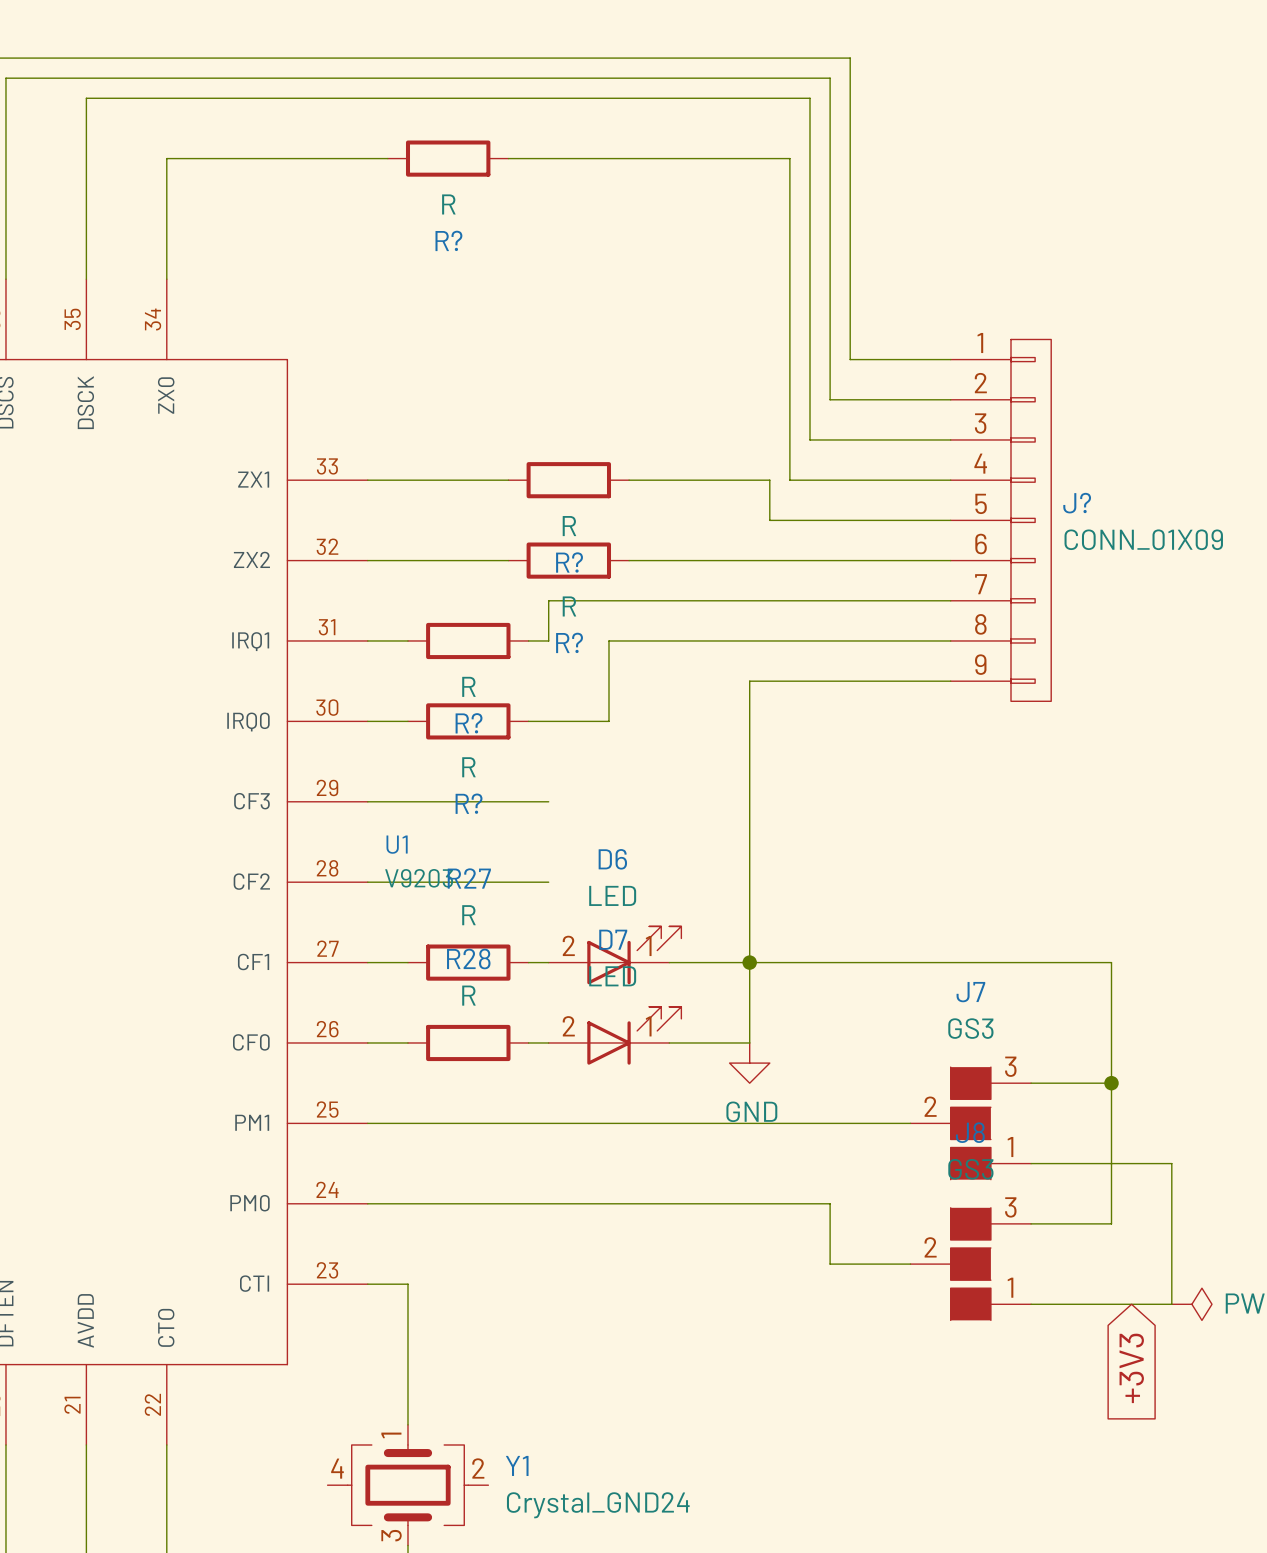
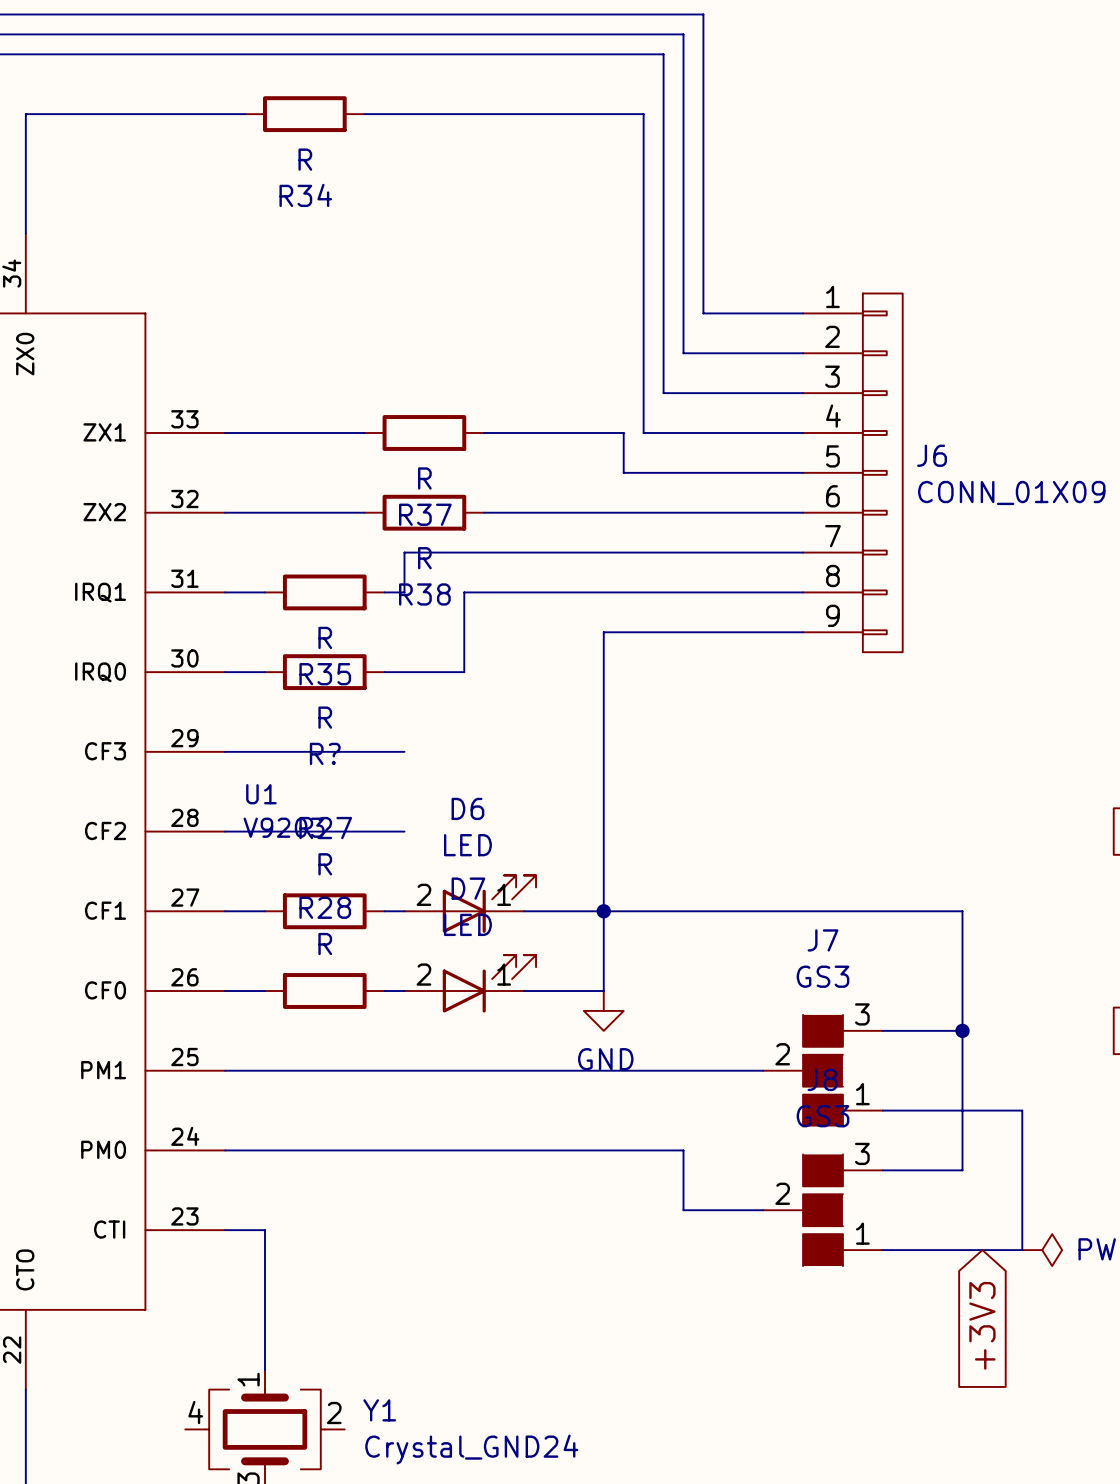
R? name: R? (448, 240) -> R34 (305, 195)
J? name: J? (1077, 503) -> J6 (932, 455)
R? name: R? (569, 562) -> R37 (425, 514)
R? name: R? (569, 642) -> R38 (424, 594)
R? name: R? (469, 723) -> R35 (325, 674)

